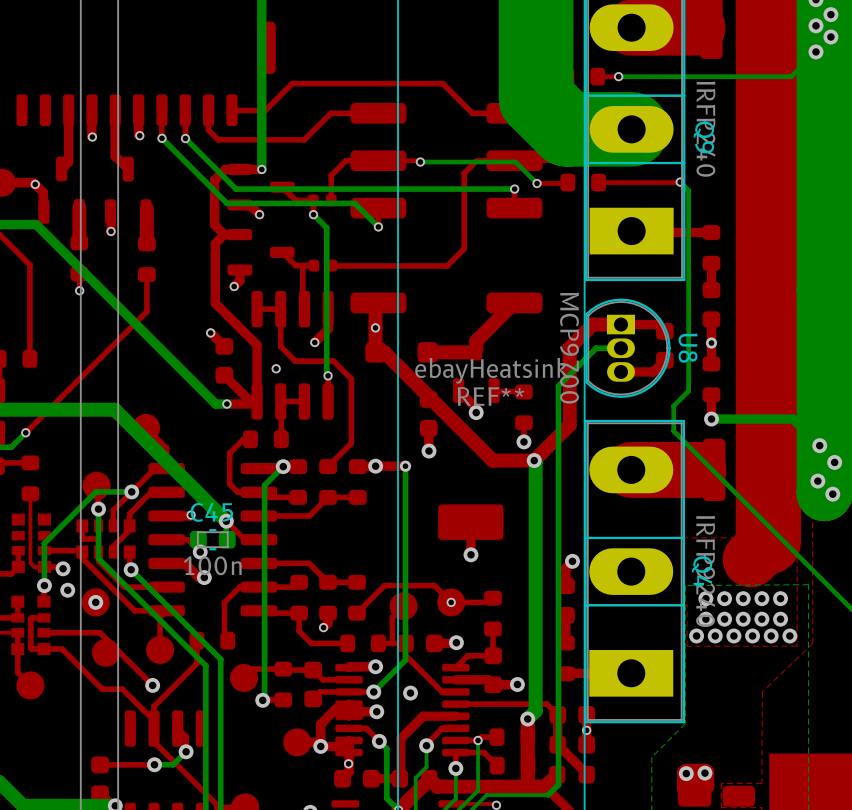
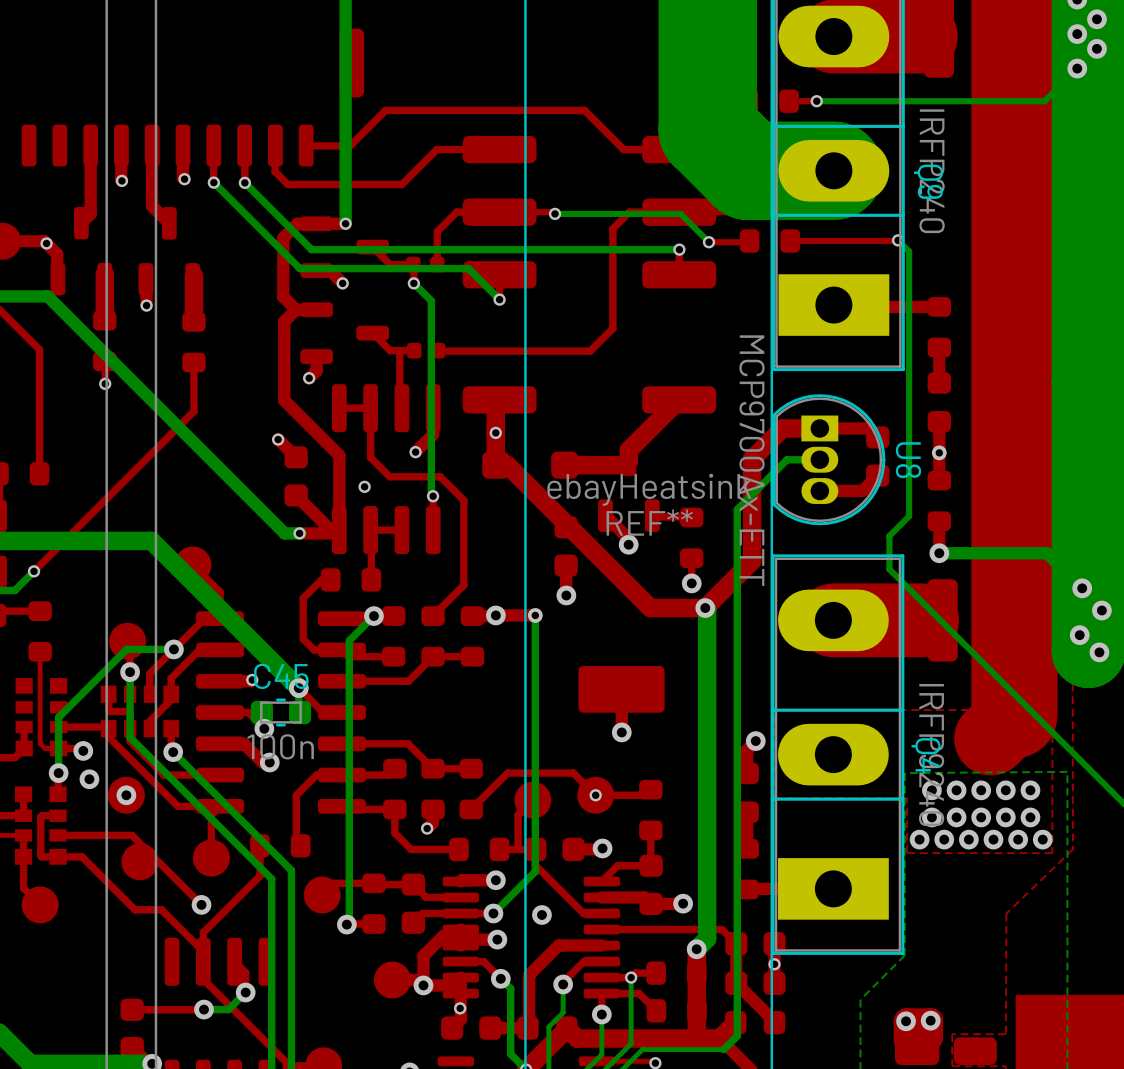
U8 value: MCP9700 (569, 348) -> MCP9700Ax-ETT (752, 460)

